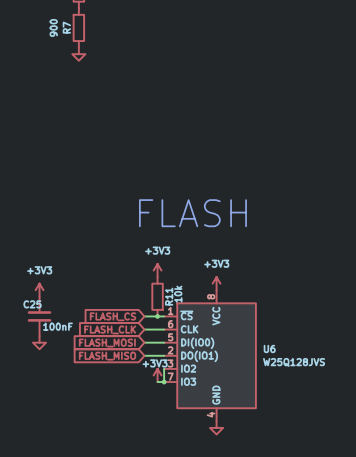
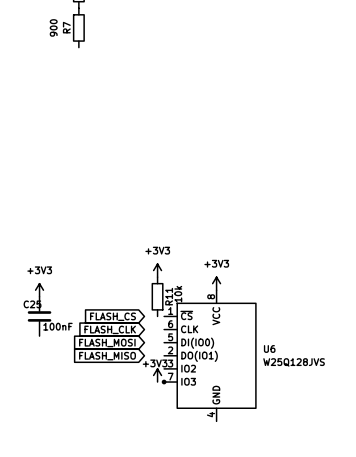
power symbol: (78, 54) -> none
text: FLASH (192, 213) -> none
wire: (144, 316) (164, 316) -> none
junction: (157, 316) -> none
wire: (144, 329) (164, 329) -> none
power symbol: (39, 342) -> none
wire: (144, 342) (164, 342) -> none
wire: (144, 355) (164, 355) -> none
wire: (164, 368) (164, 382) (157, 382) -> none
power symbol: (216, 427) -> none

